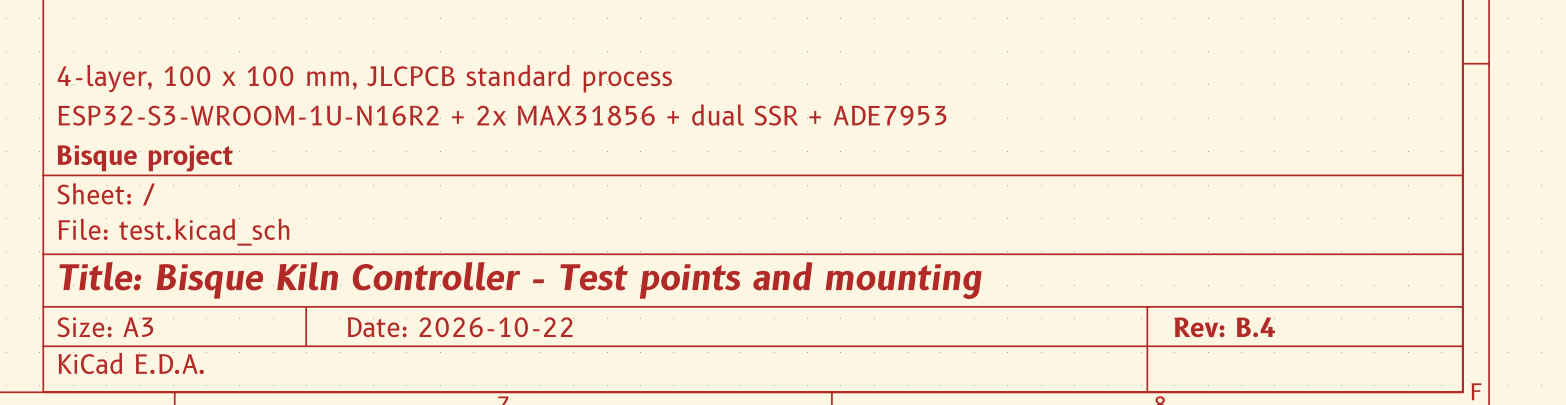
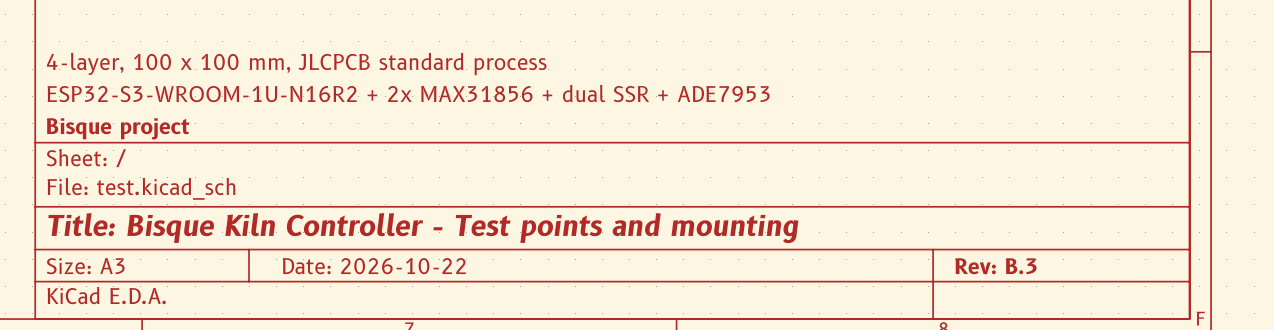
title block: Rev: B.4 (1224, 327) -> Rev: B.3 (995, 266)

